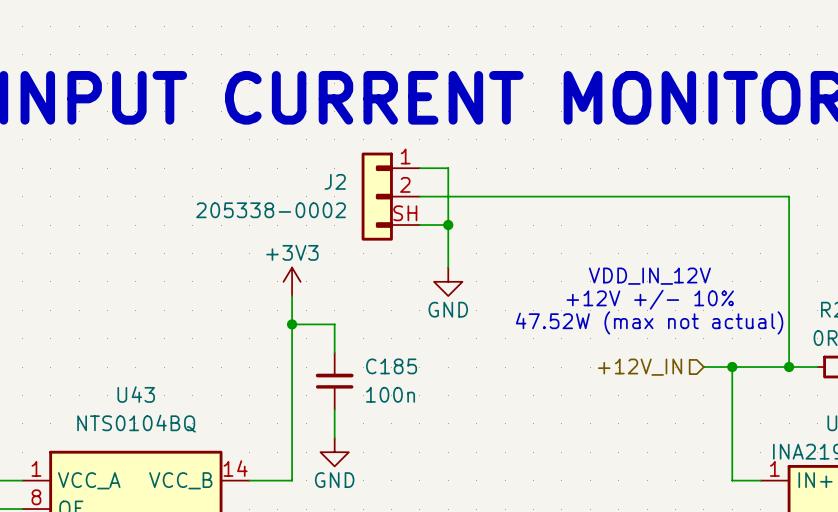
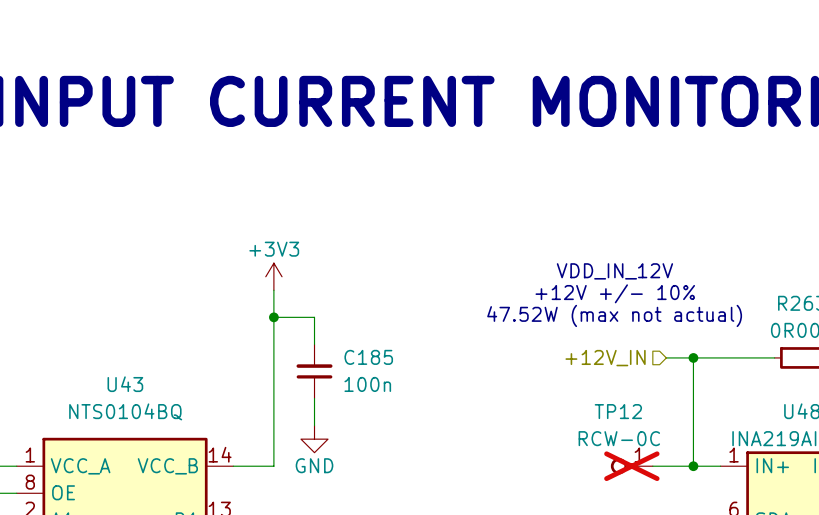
wire: (419, 168) (448, 168) (448, 267) -> none
J2: (390, 196) -> none
wire: (419, 196) (789, 196) (789, 367) -> none
wire: (419, 225) (448, 225) -> none
junction: (448, 225) -> none
power symbol: GND (448, 281) -> none
junction: (789, 367) -> none
TP12: none -> (631, 466)
wire: none -> (652, 466) (693, 466)
junction: none -> (693, 466)

